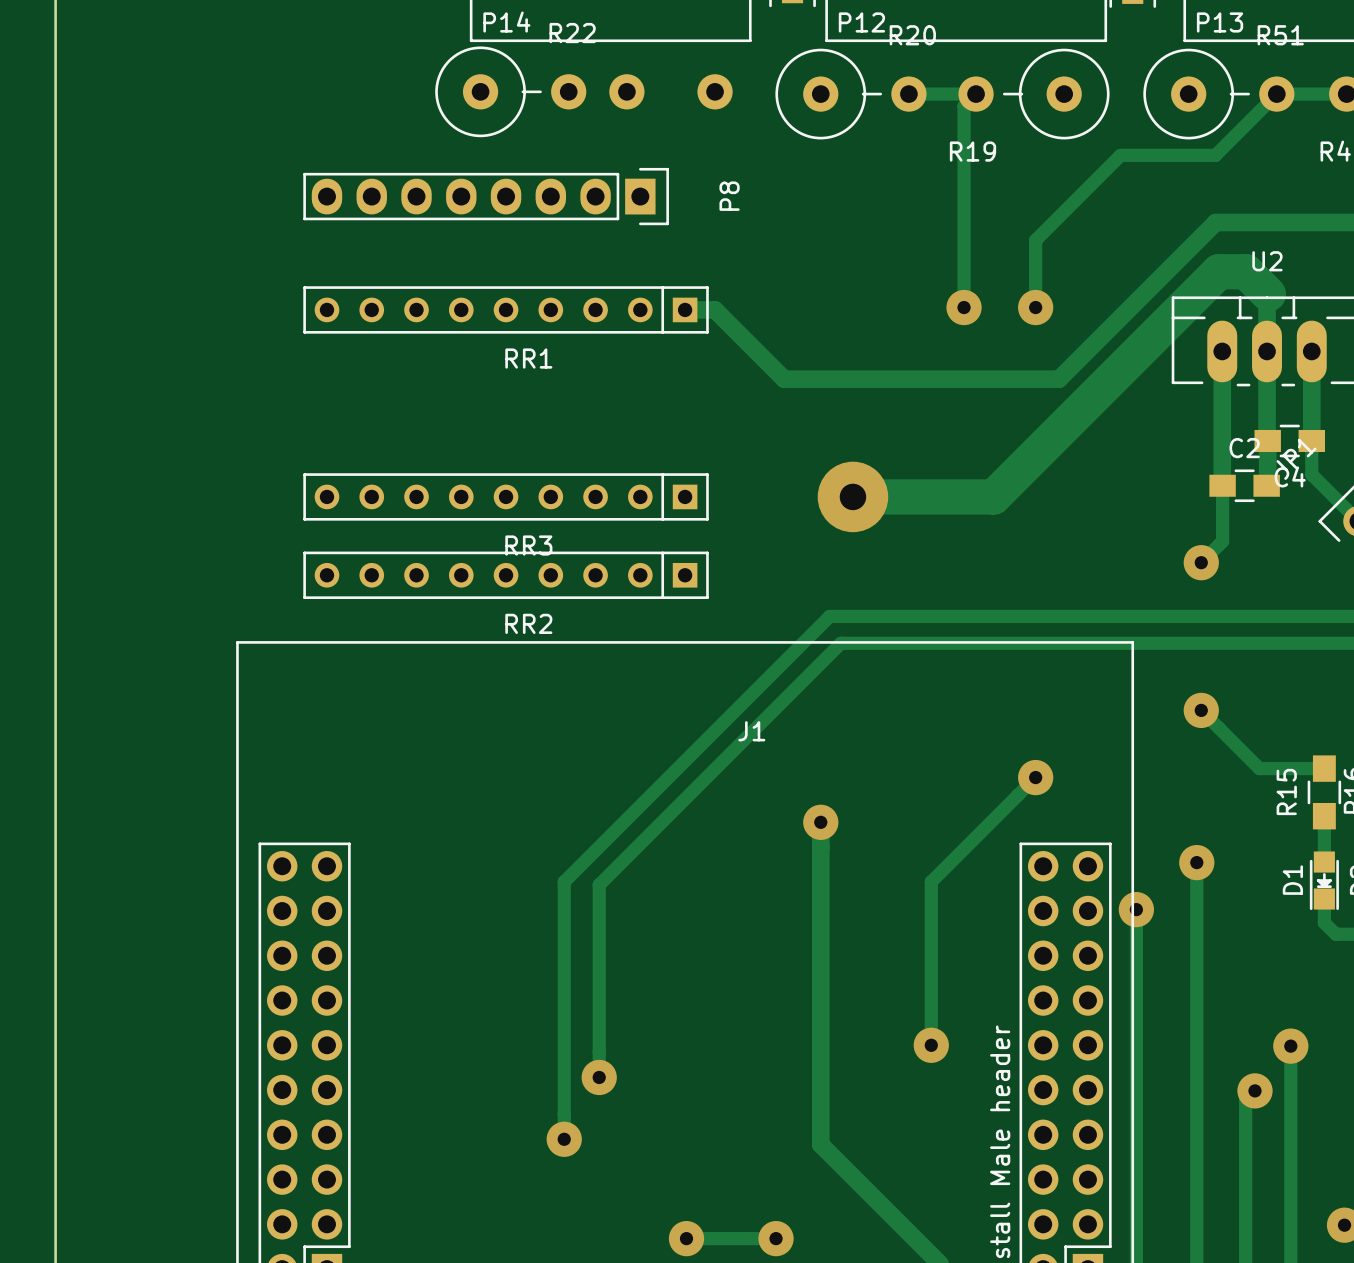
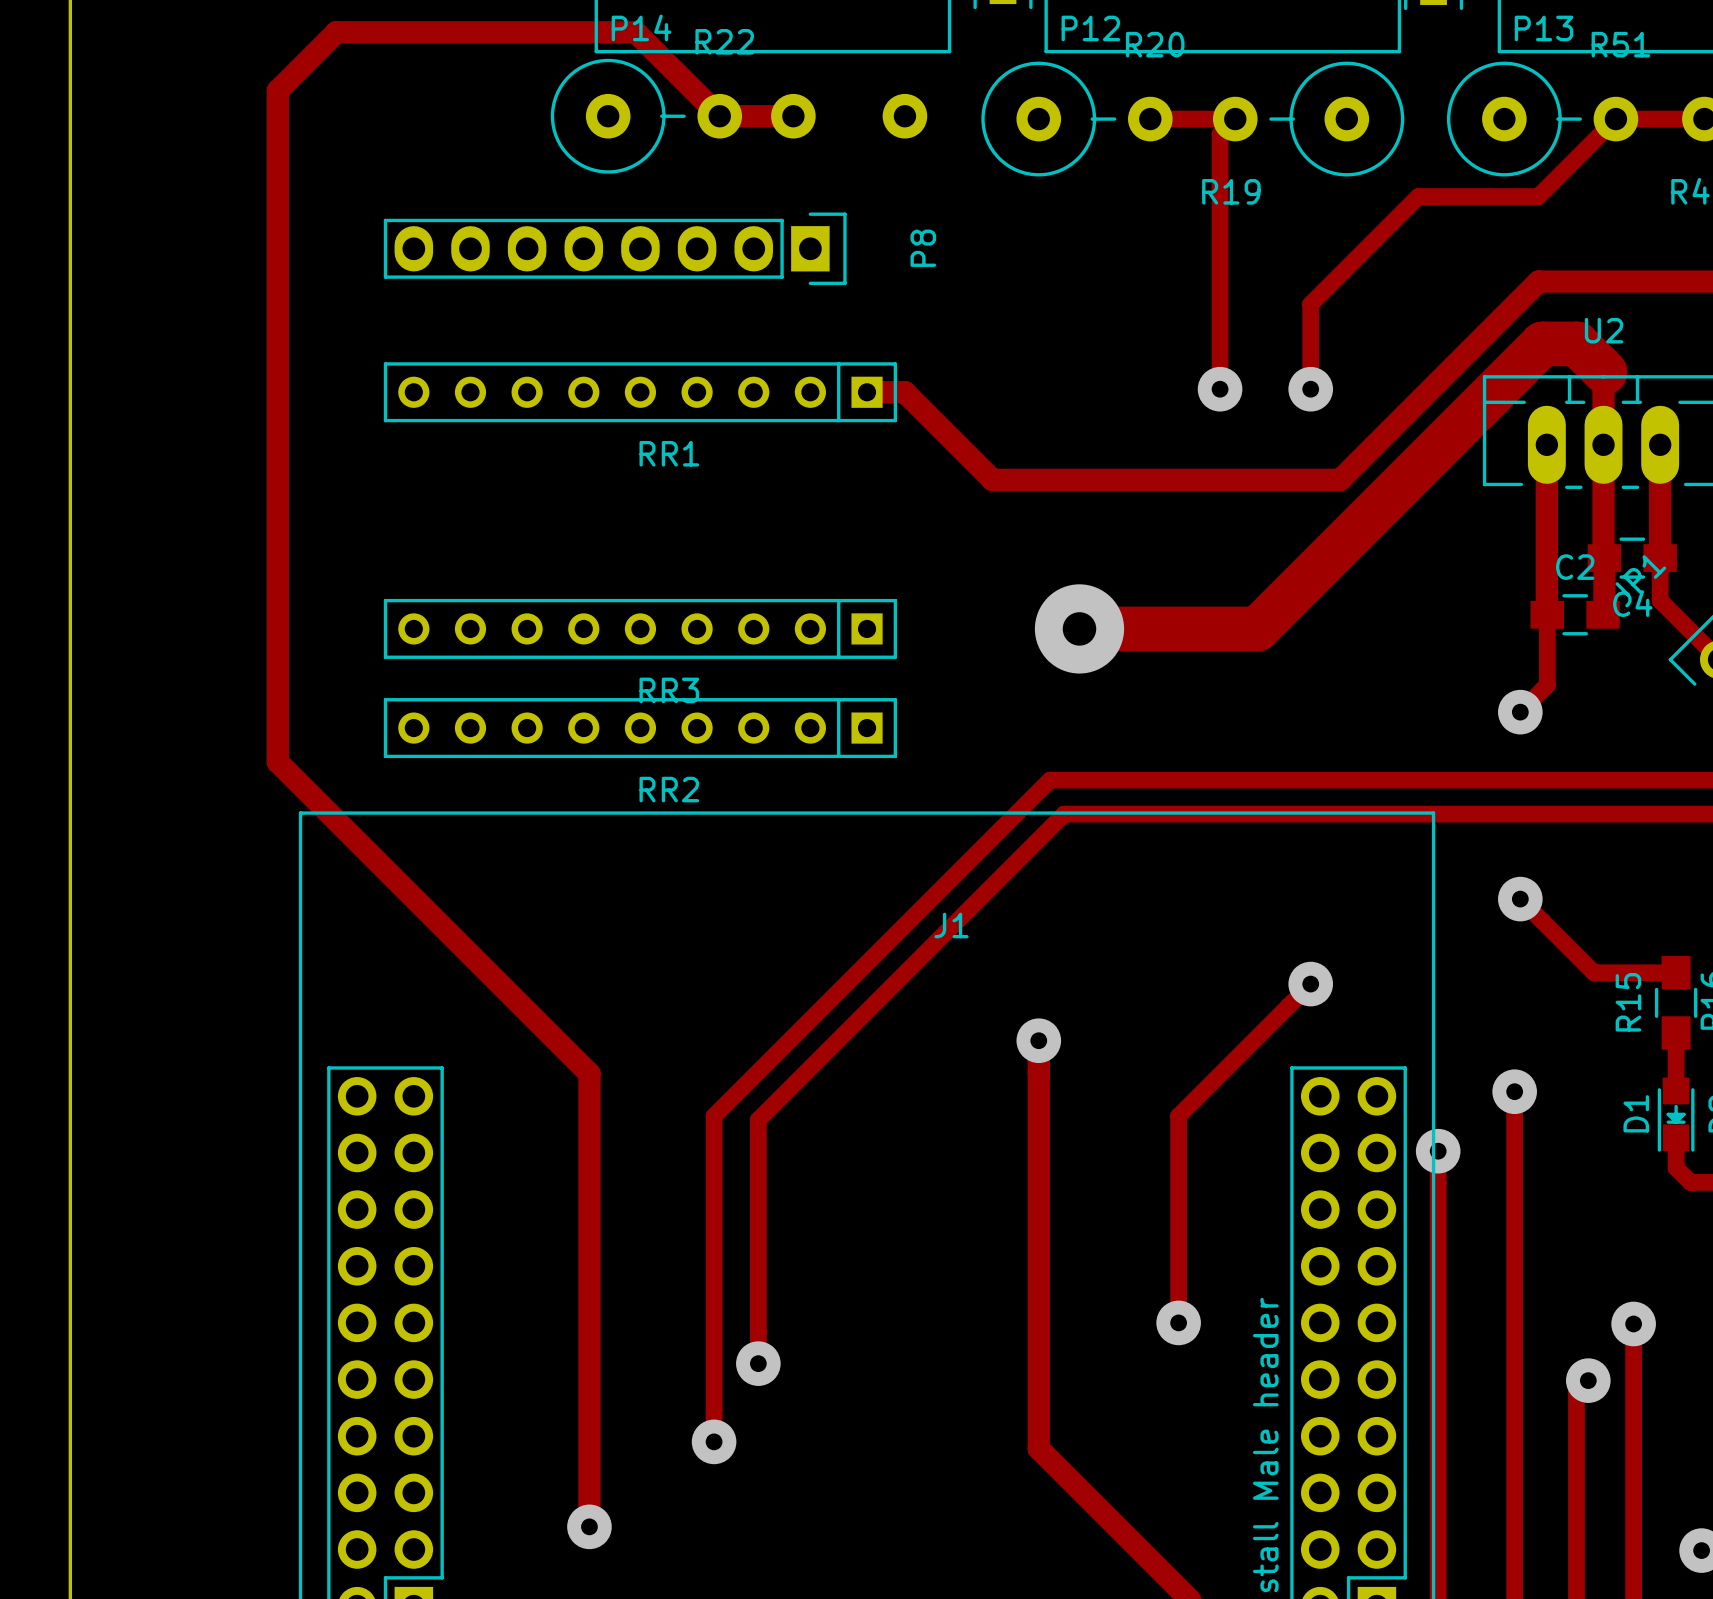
track: none -> (793, 116) (719, 116) (635, 32) (336, 32) (277, 90) (277, 762) (589, 1073) (589, 1526)
via: none -> (589, 1526)
track: (686, 1238) (776, 1238) -> none
via: (686, 1238) -> none
via: (776, 1238) -> none

